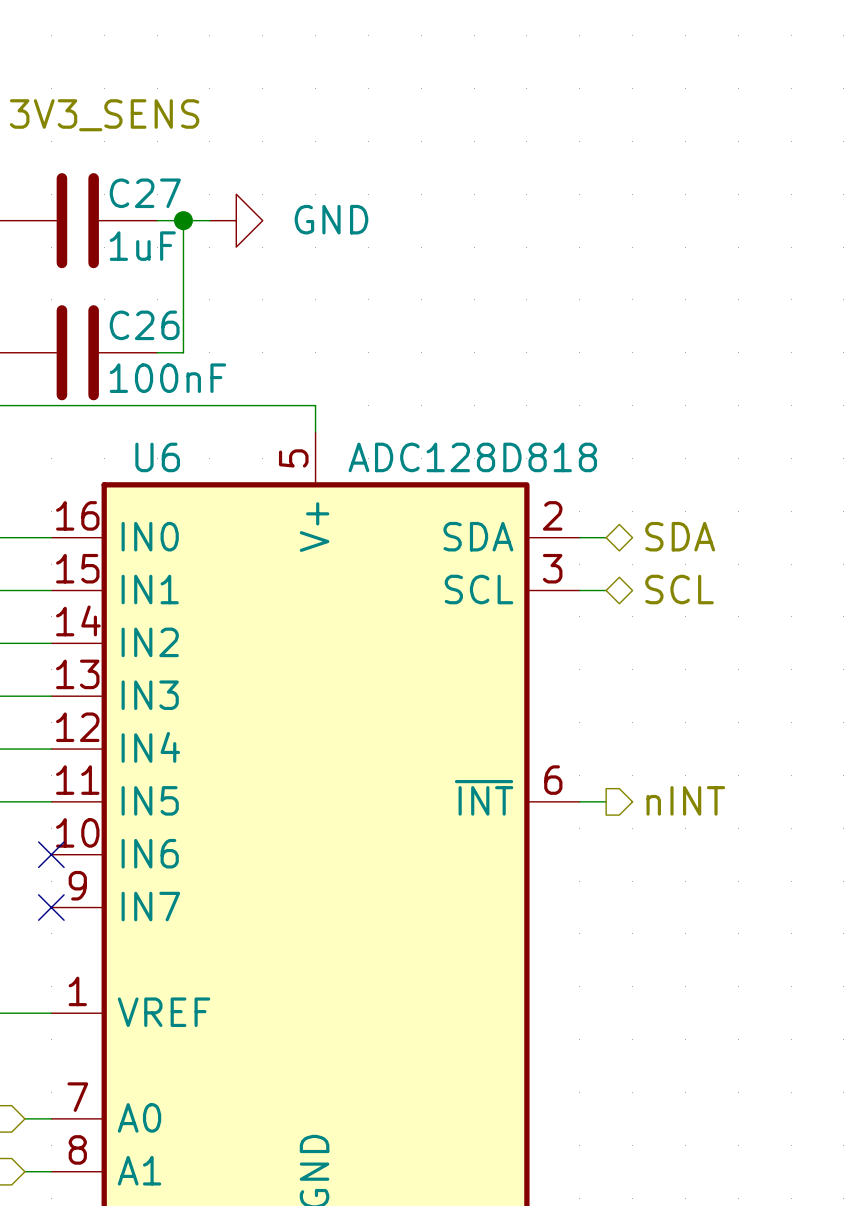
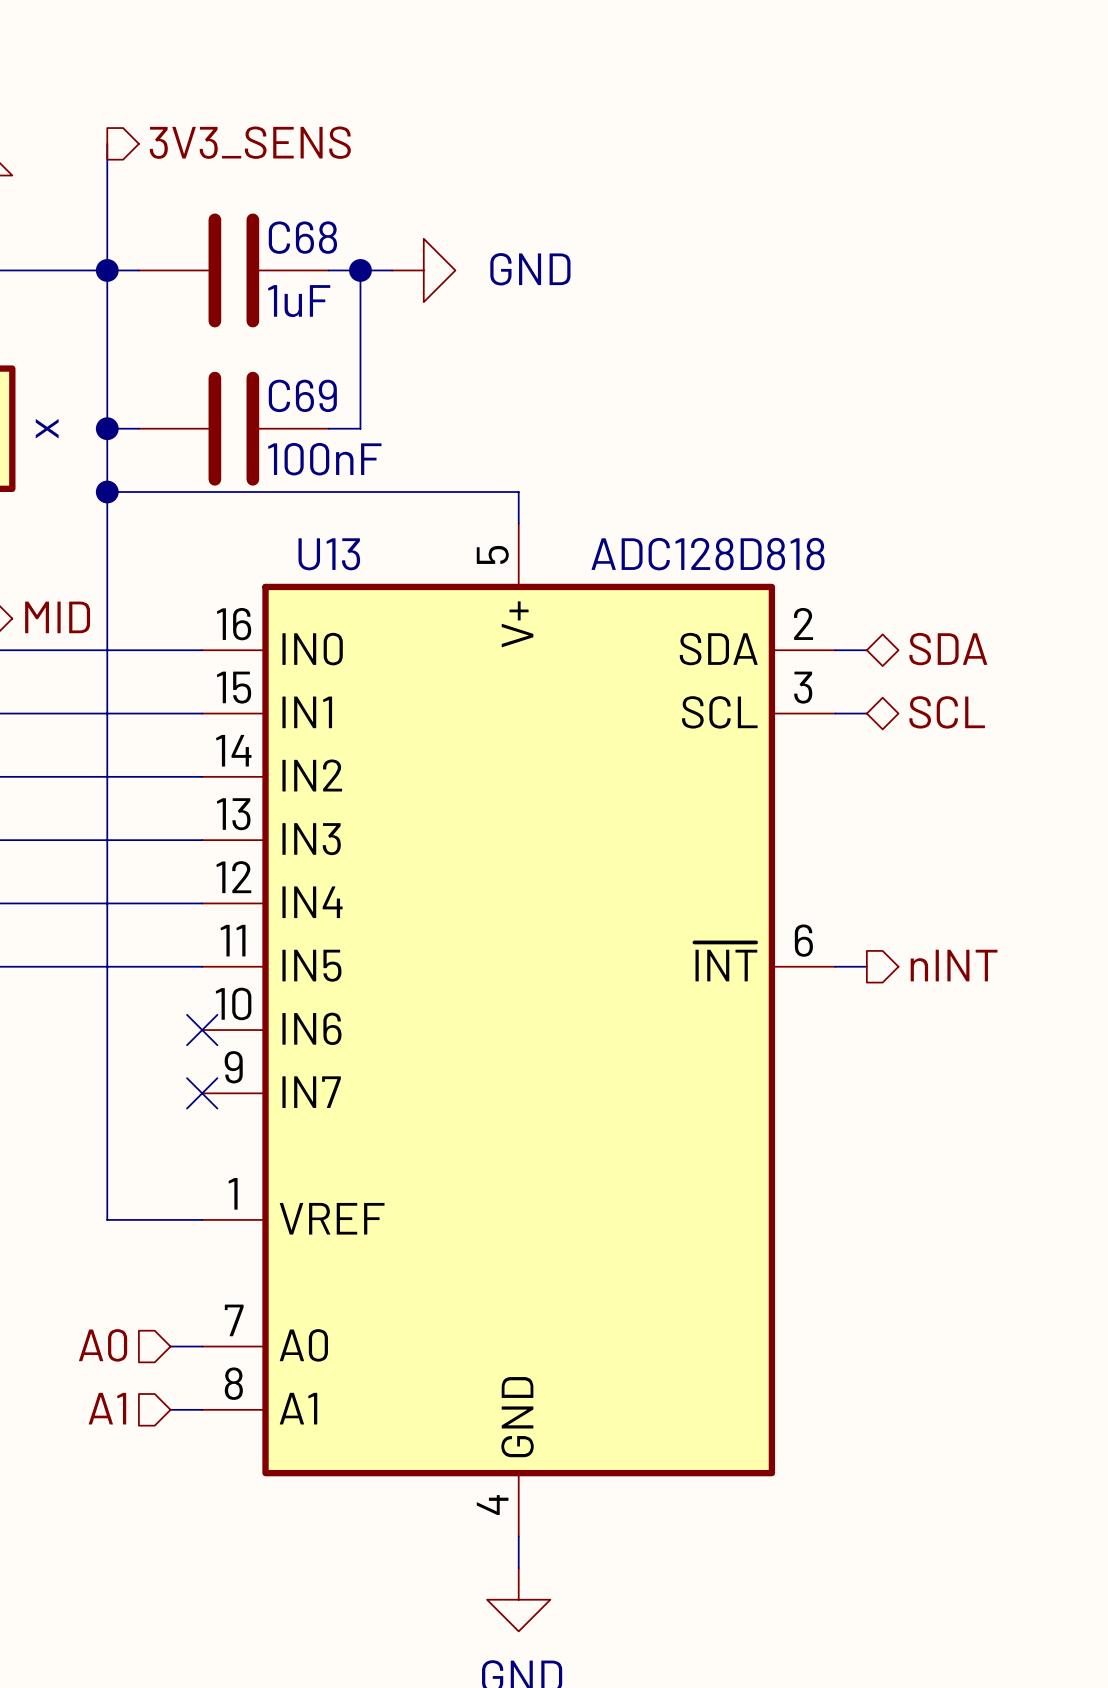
C27 name: C27 (145, 193) -> C68 (302, 237)
C26 name: C26 (144, 325) -> C69 (302, 395)
U6 name: U6 (157, 457) -> U13 (329, 554)

